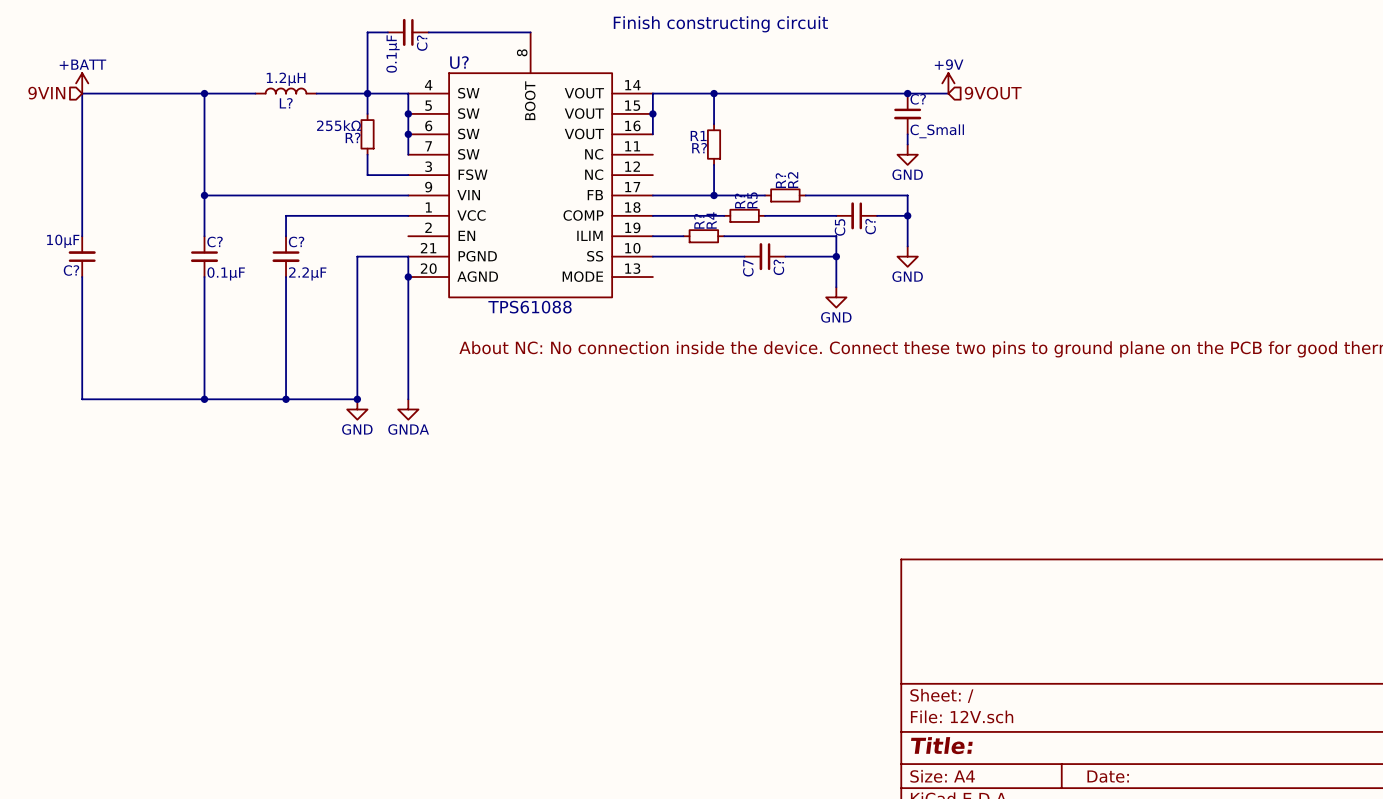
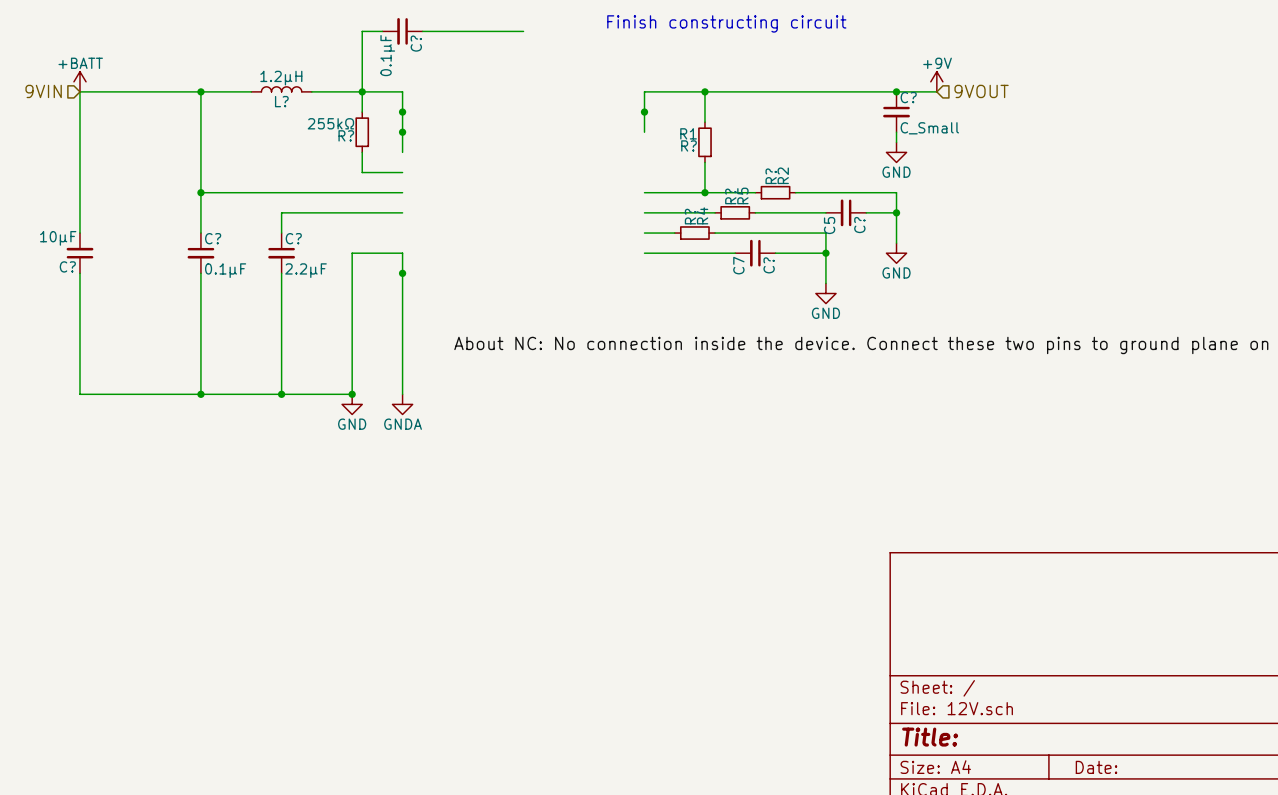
U?: TPS61088 (530, 164) -> none

